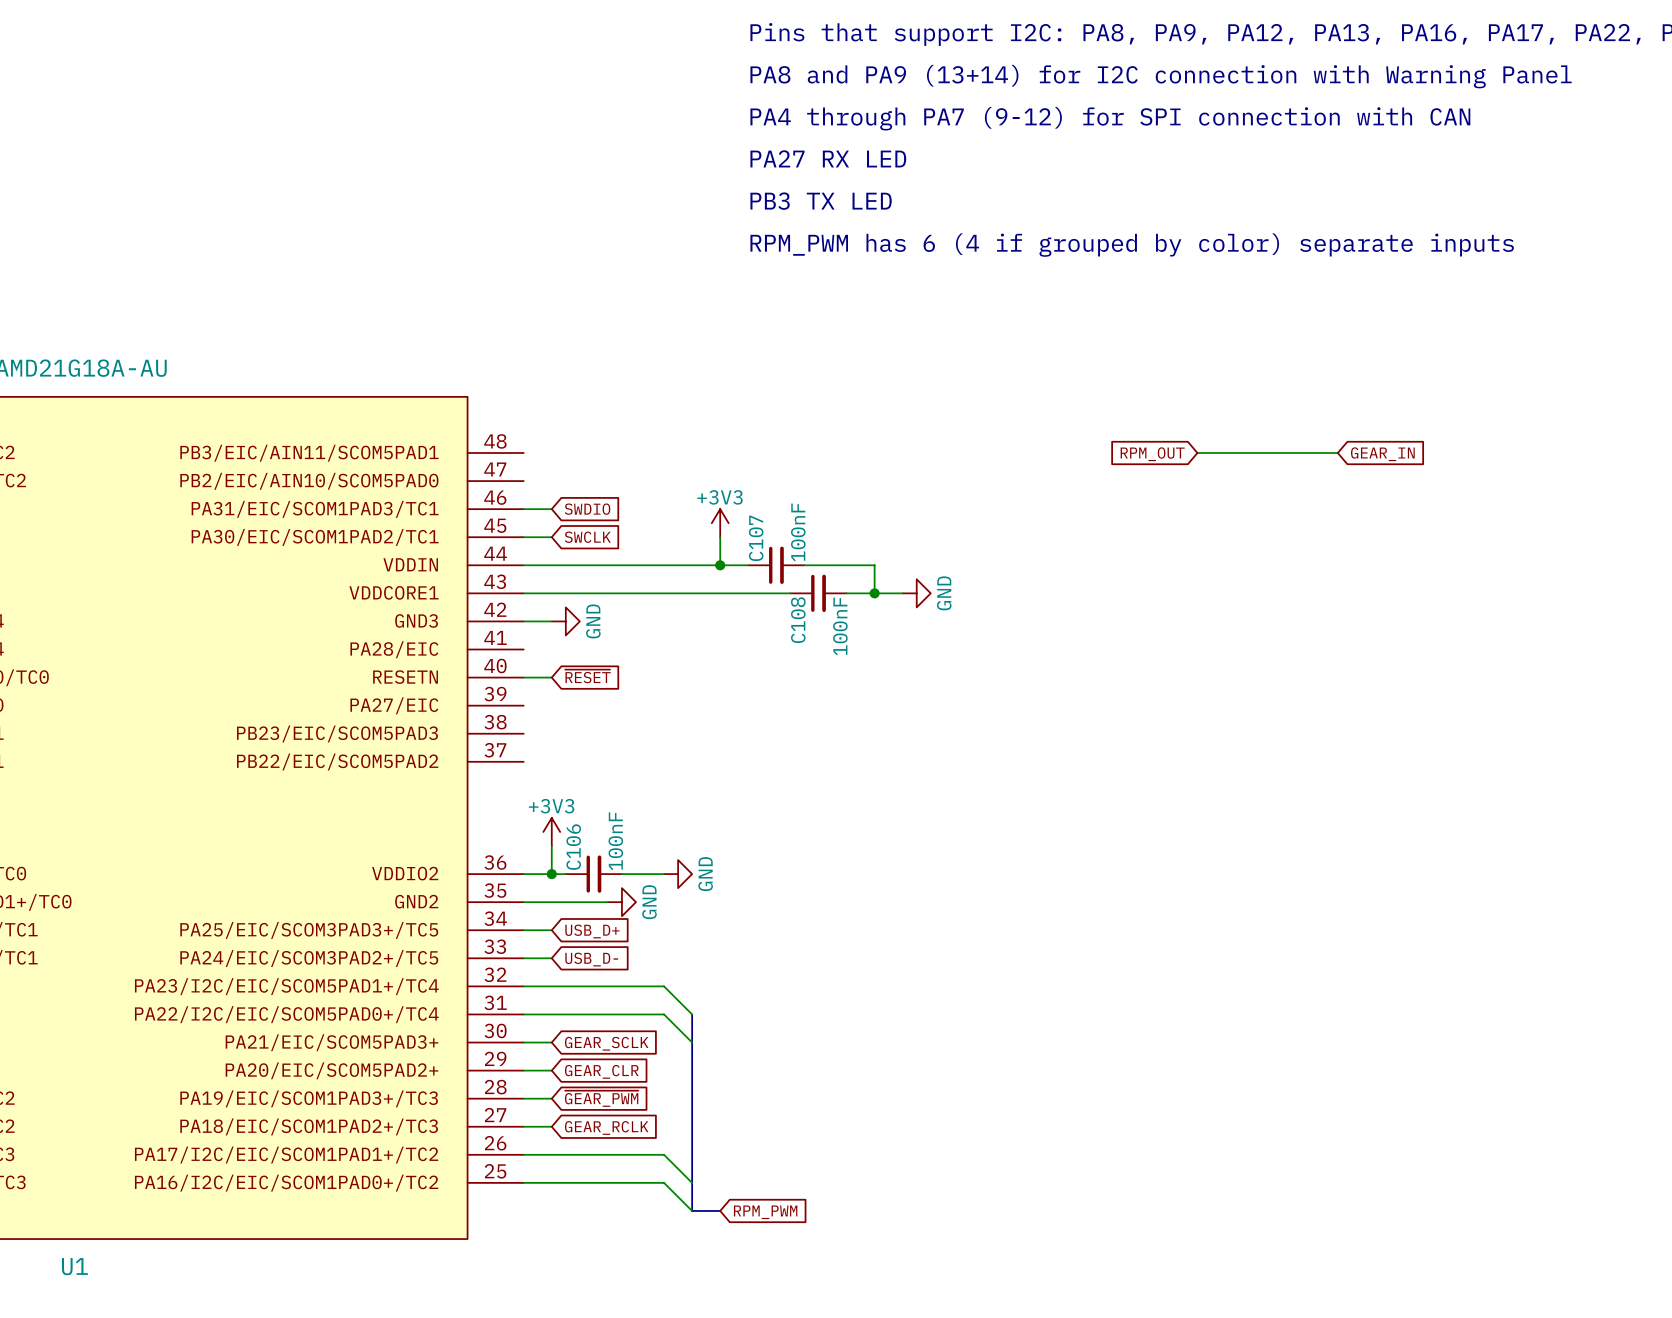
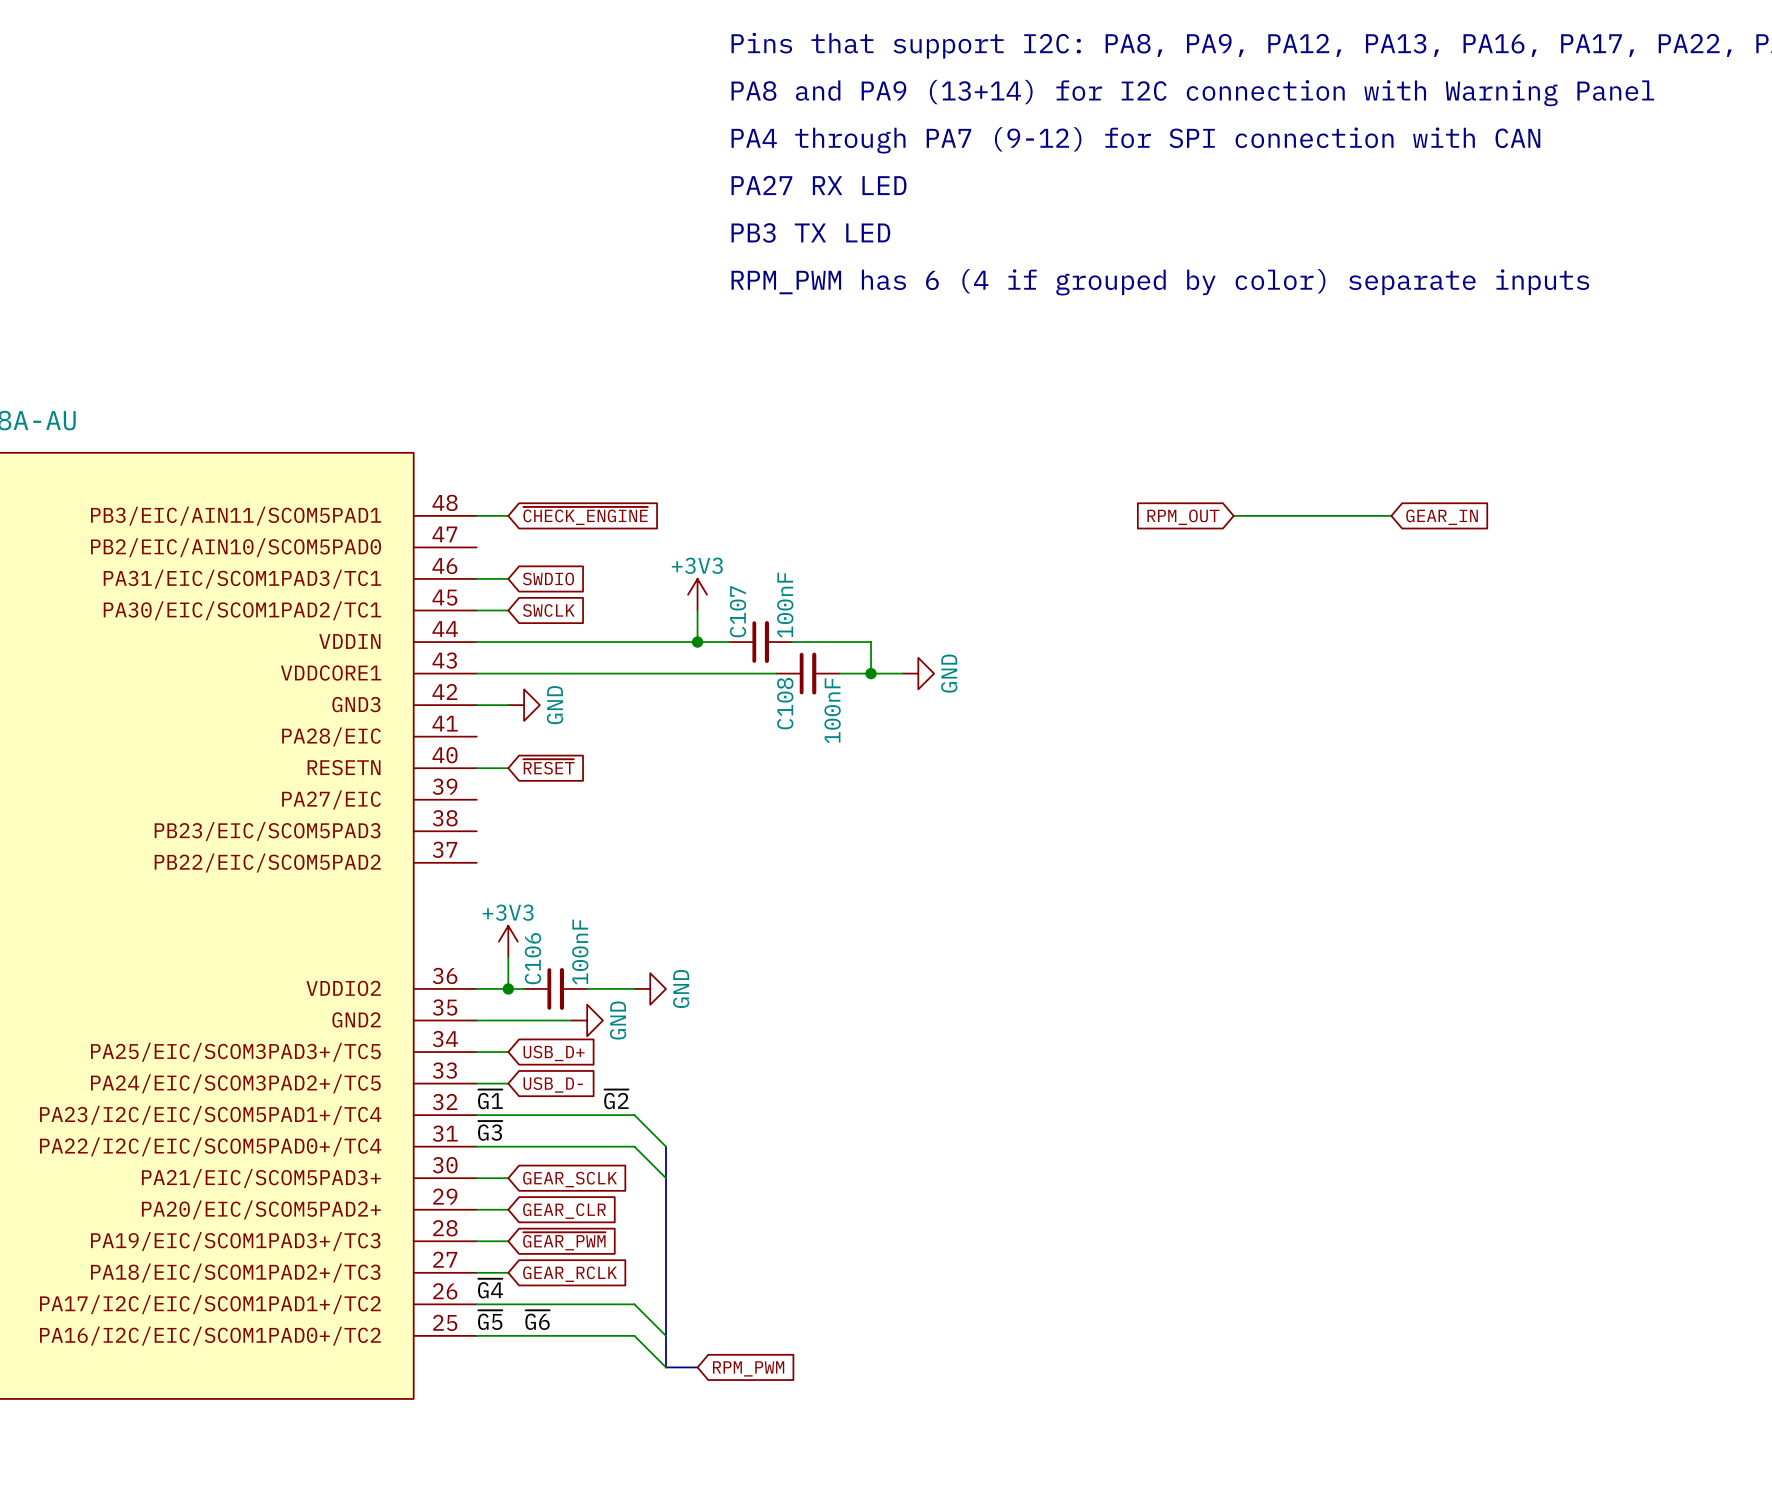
wire: none -> (476, 515) (508, 515)
global label: none -> ~{CHECK_ENGINE} (585, 515)
label: none -> ~{G1} (490, 1099)
label: none -> ~{G2} (616, 1099)
label: none -> ~{G3} (490, 1130)
label: none -> ~{G4} (490, 1288)
label: none -> ~{G5} (490, 1320)
label: none -> ~{G6} (537, 1320)

